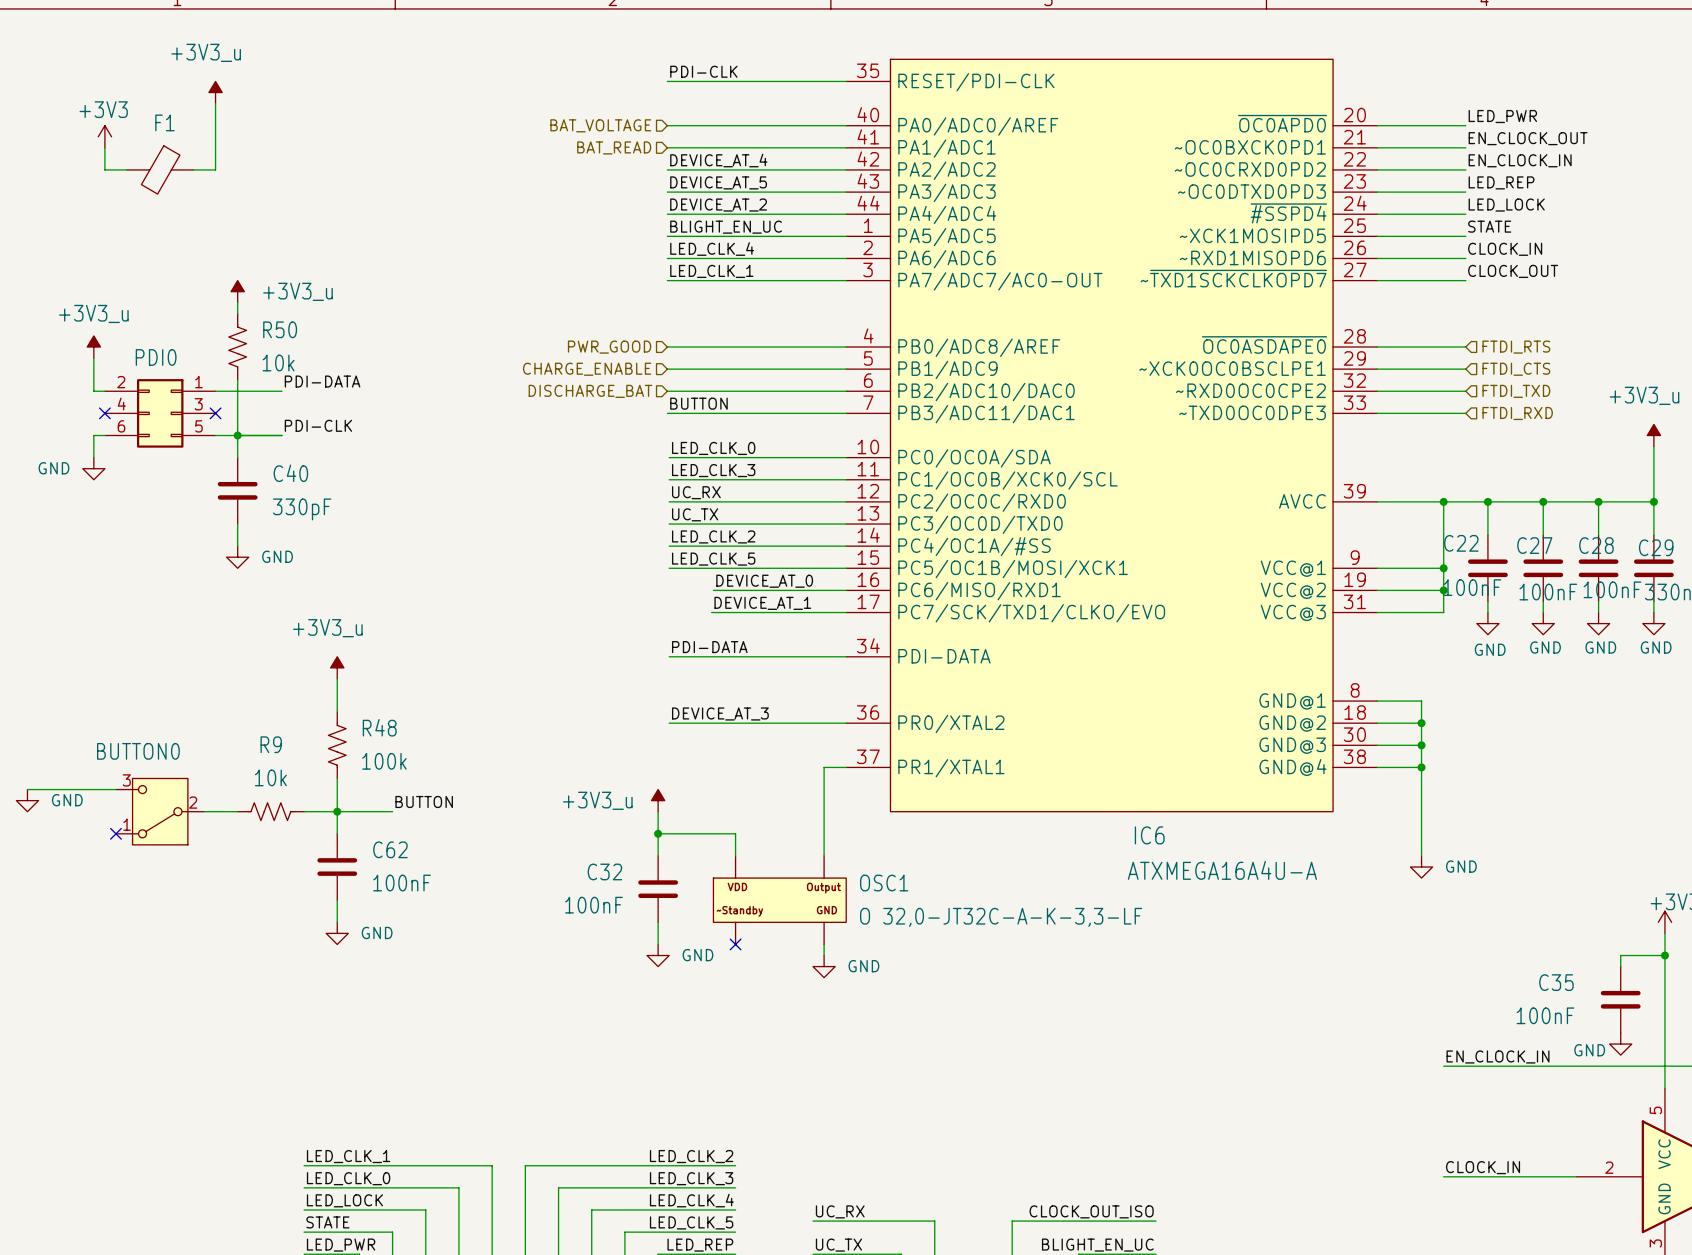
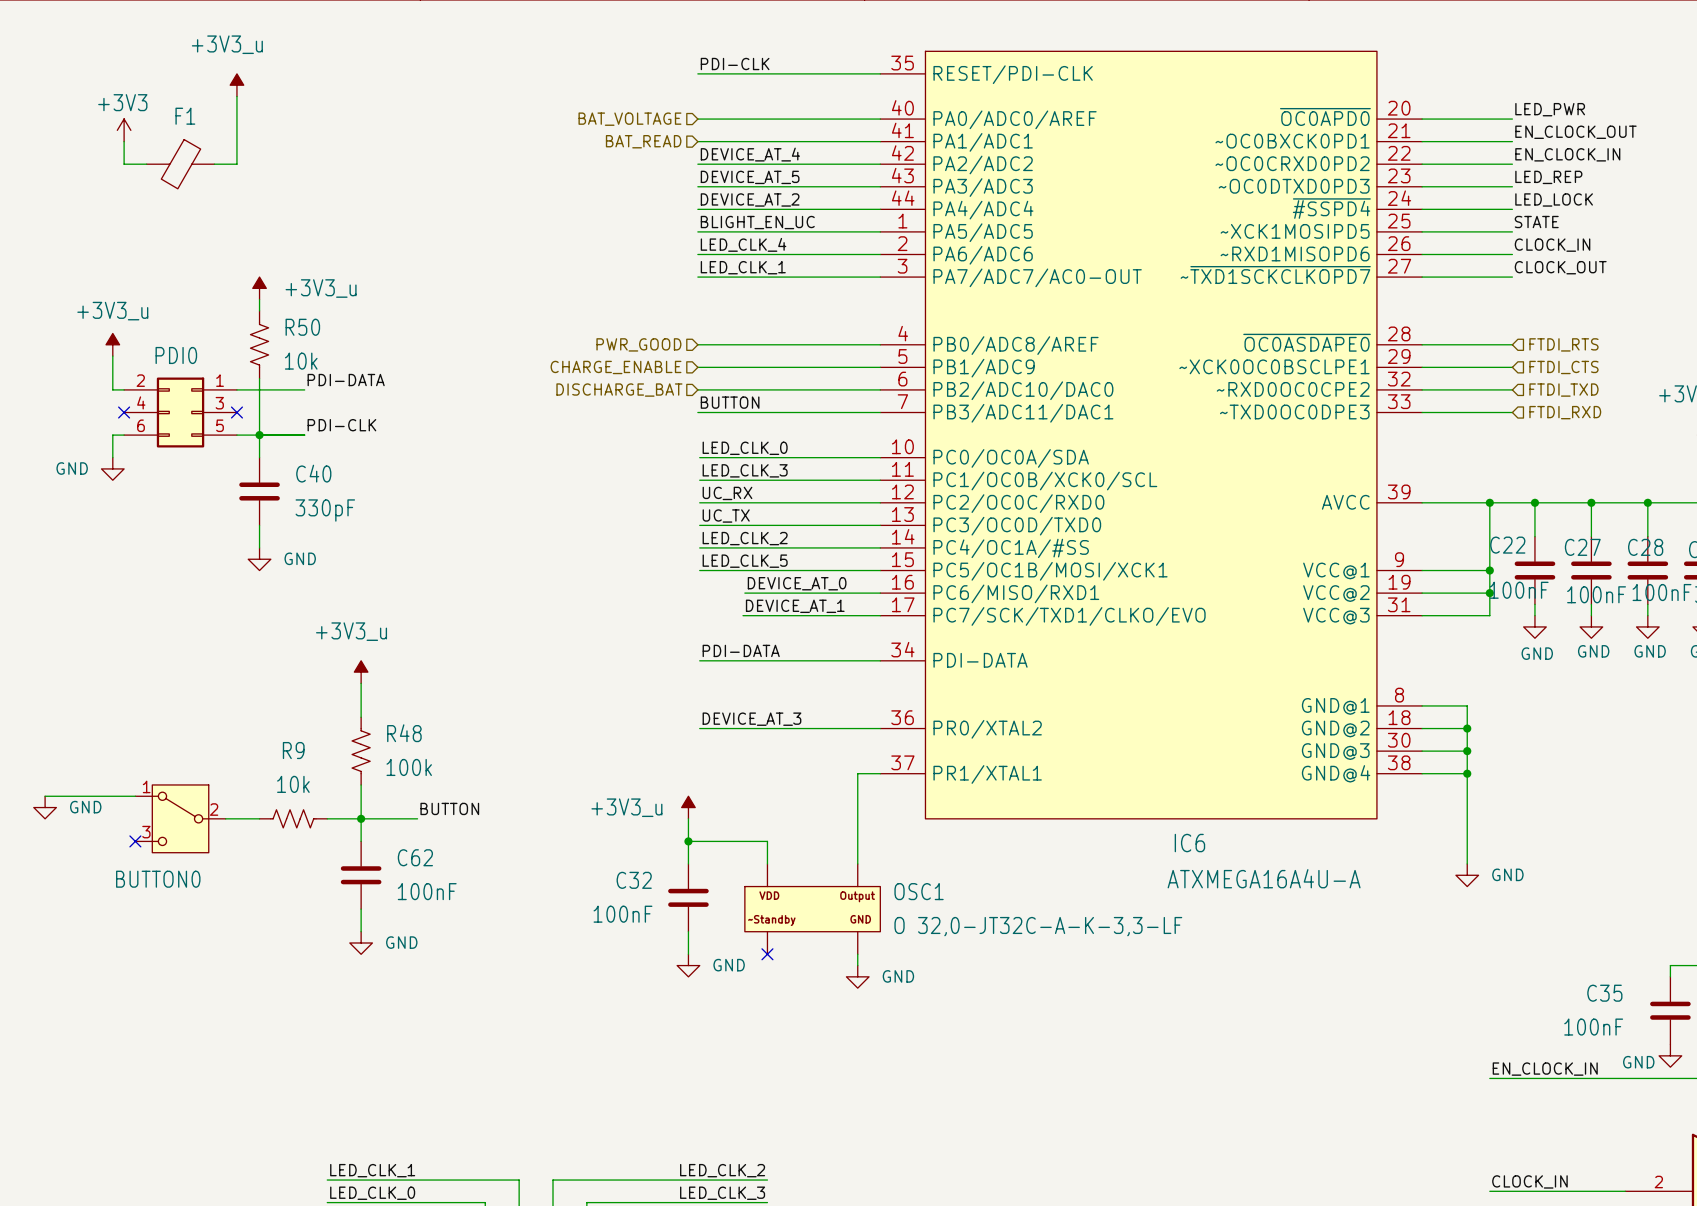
BUTTON0 flip: as is (160, 811) -> up-down (180, 818)

